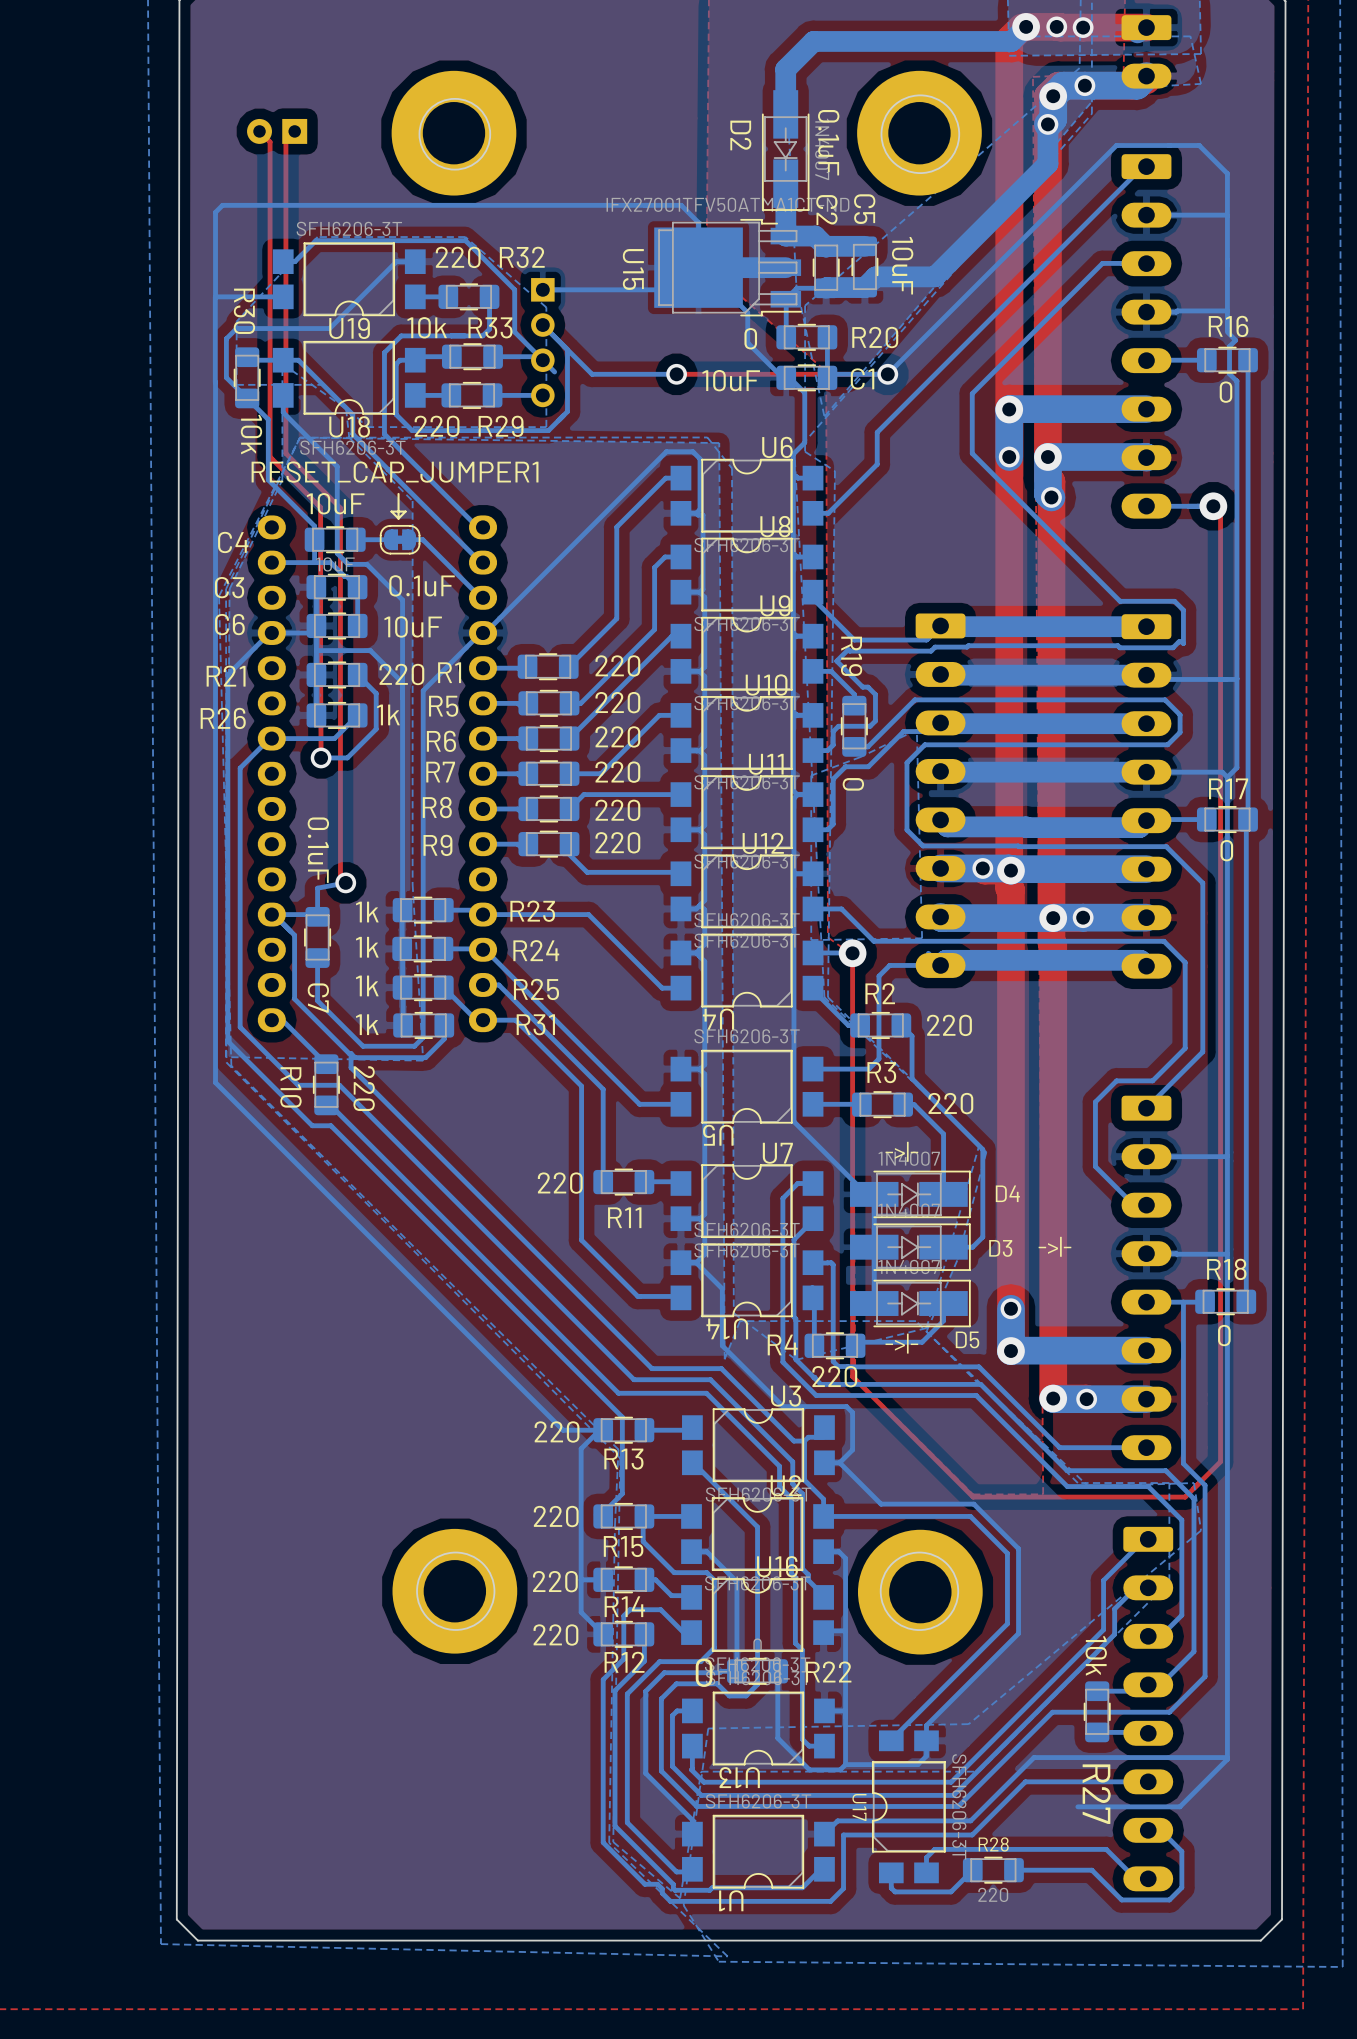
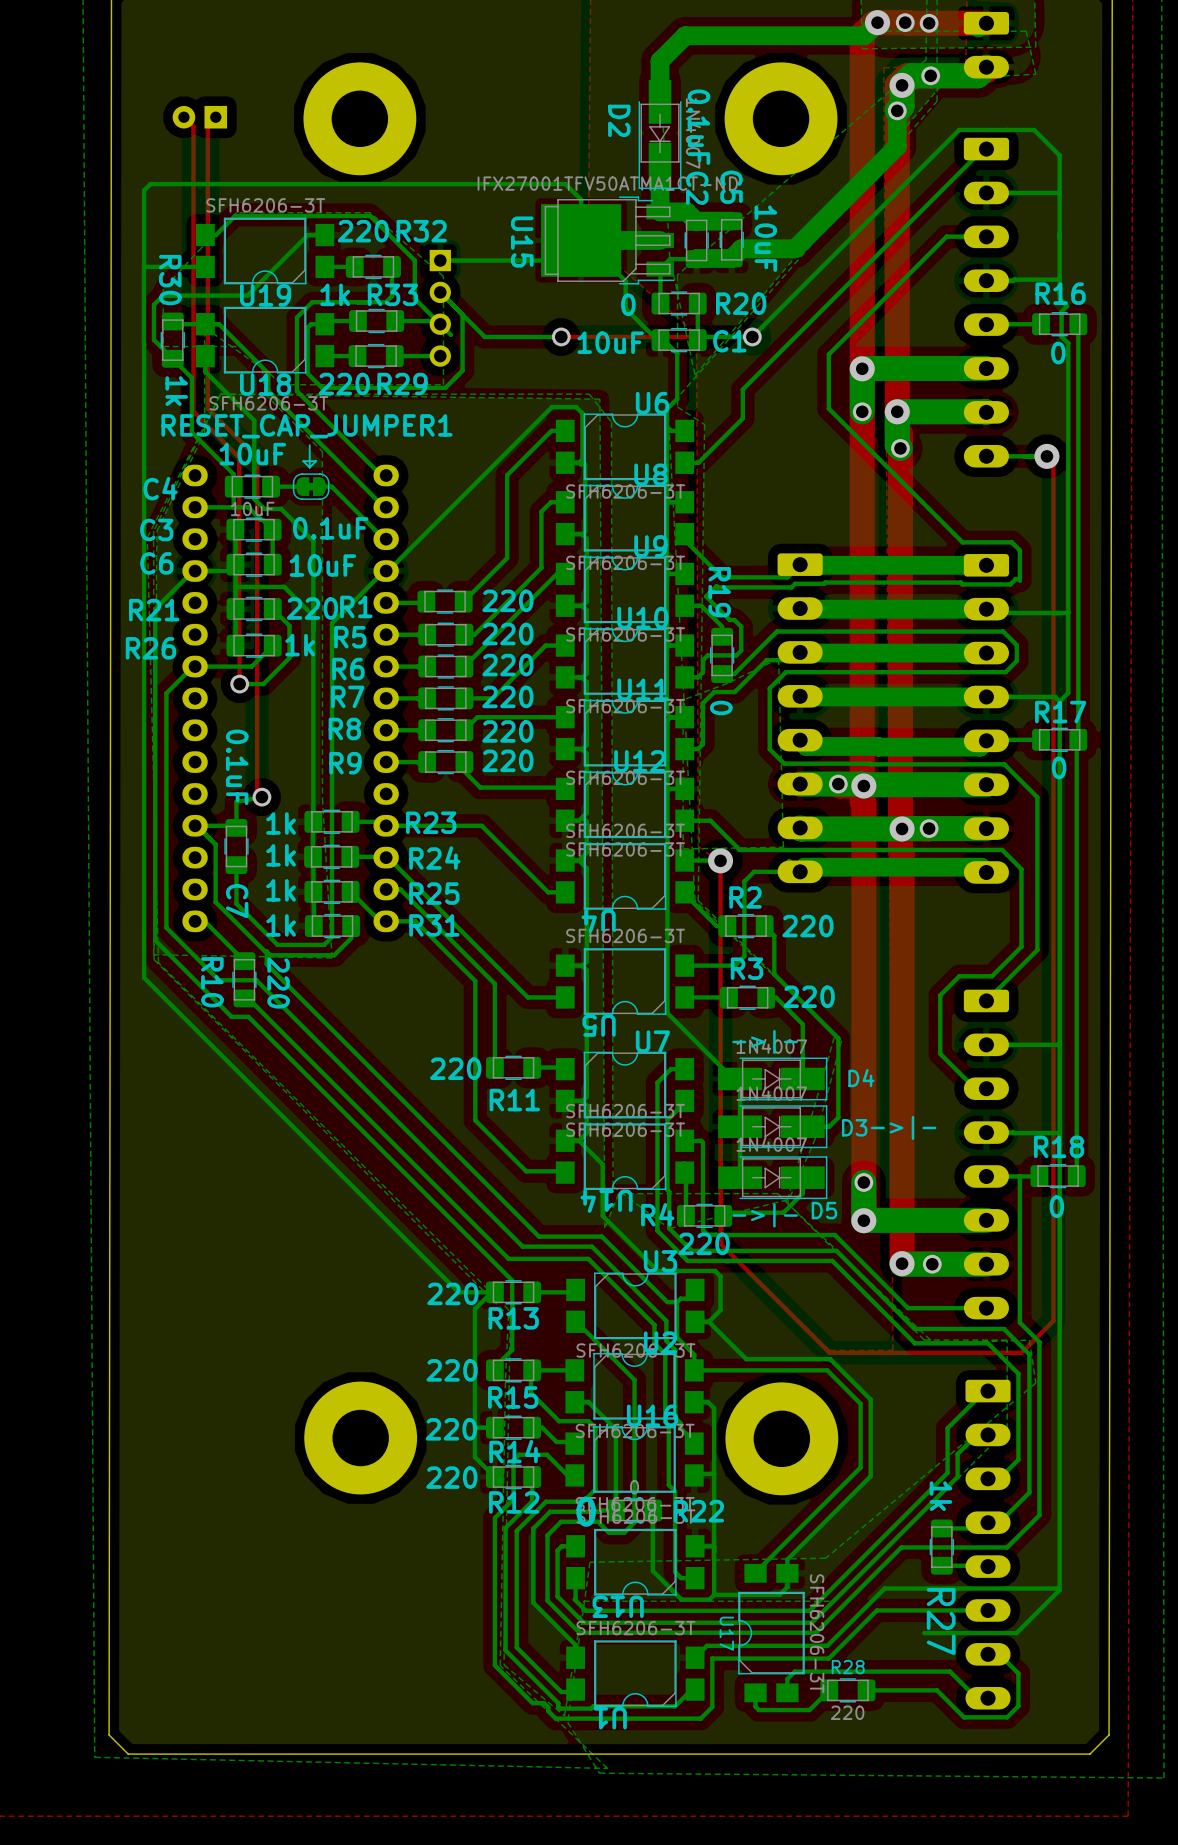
R33 value: 10k (427, 327) -> 1k (335, 294)
R30 value: 10k (251, 434) -> 1k (176, 391)
R27 value: 10k (1096, 1655) -> 1k (940, 1496)

